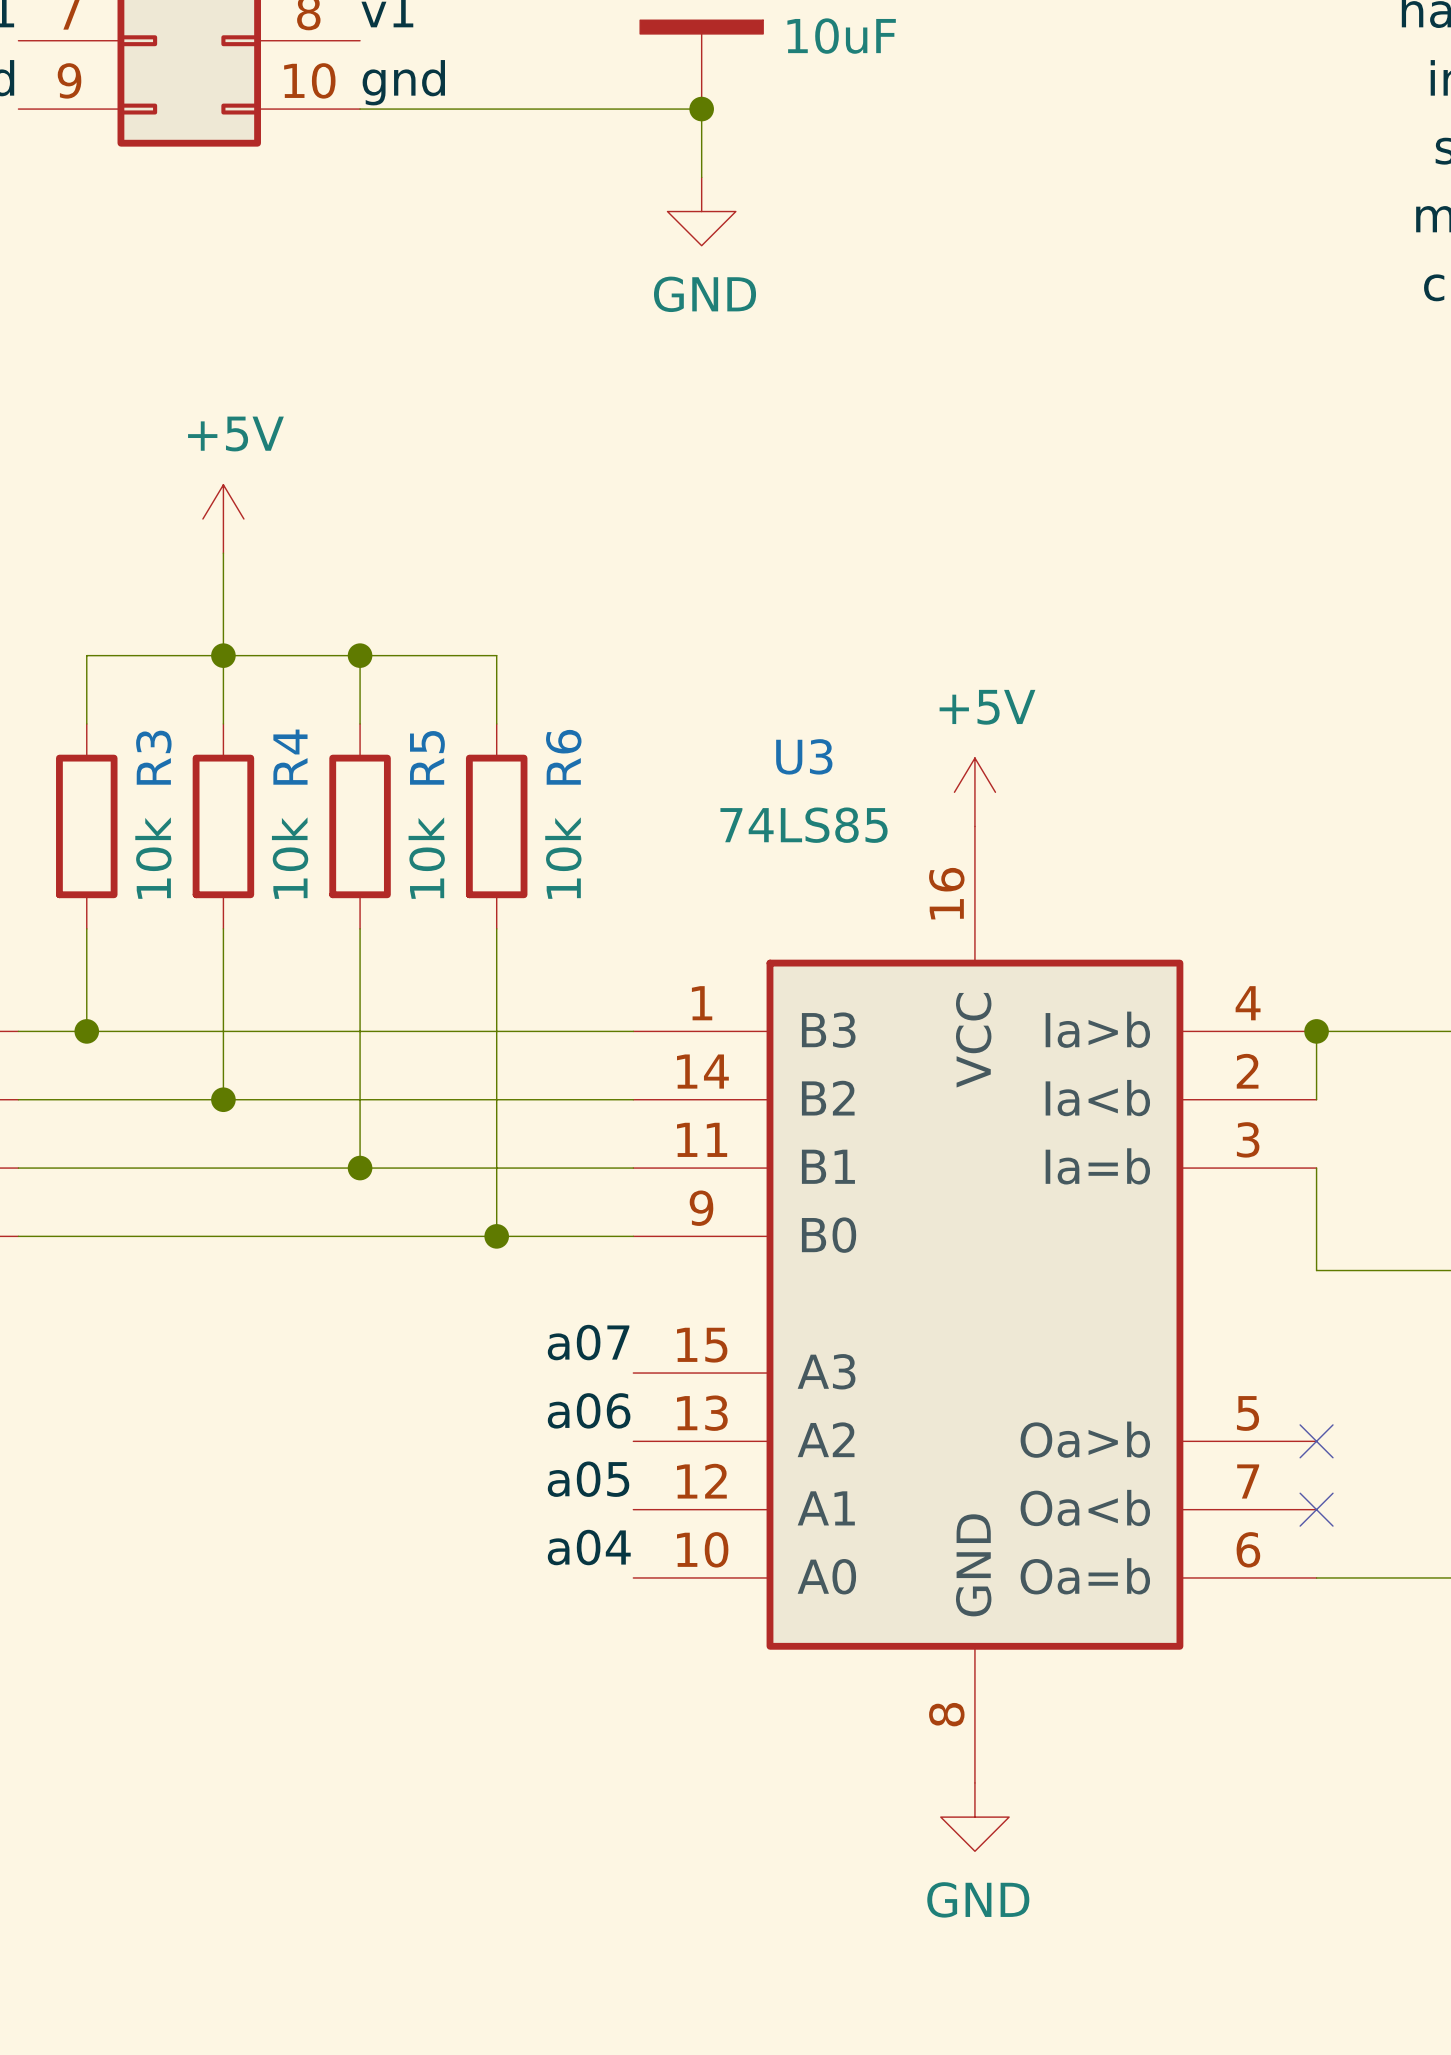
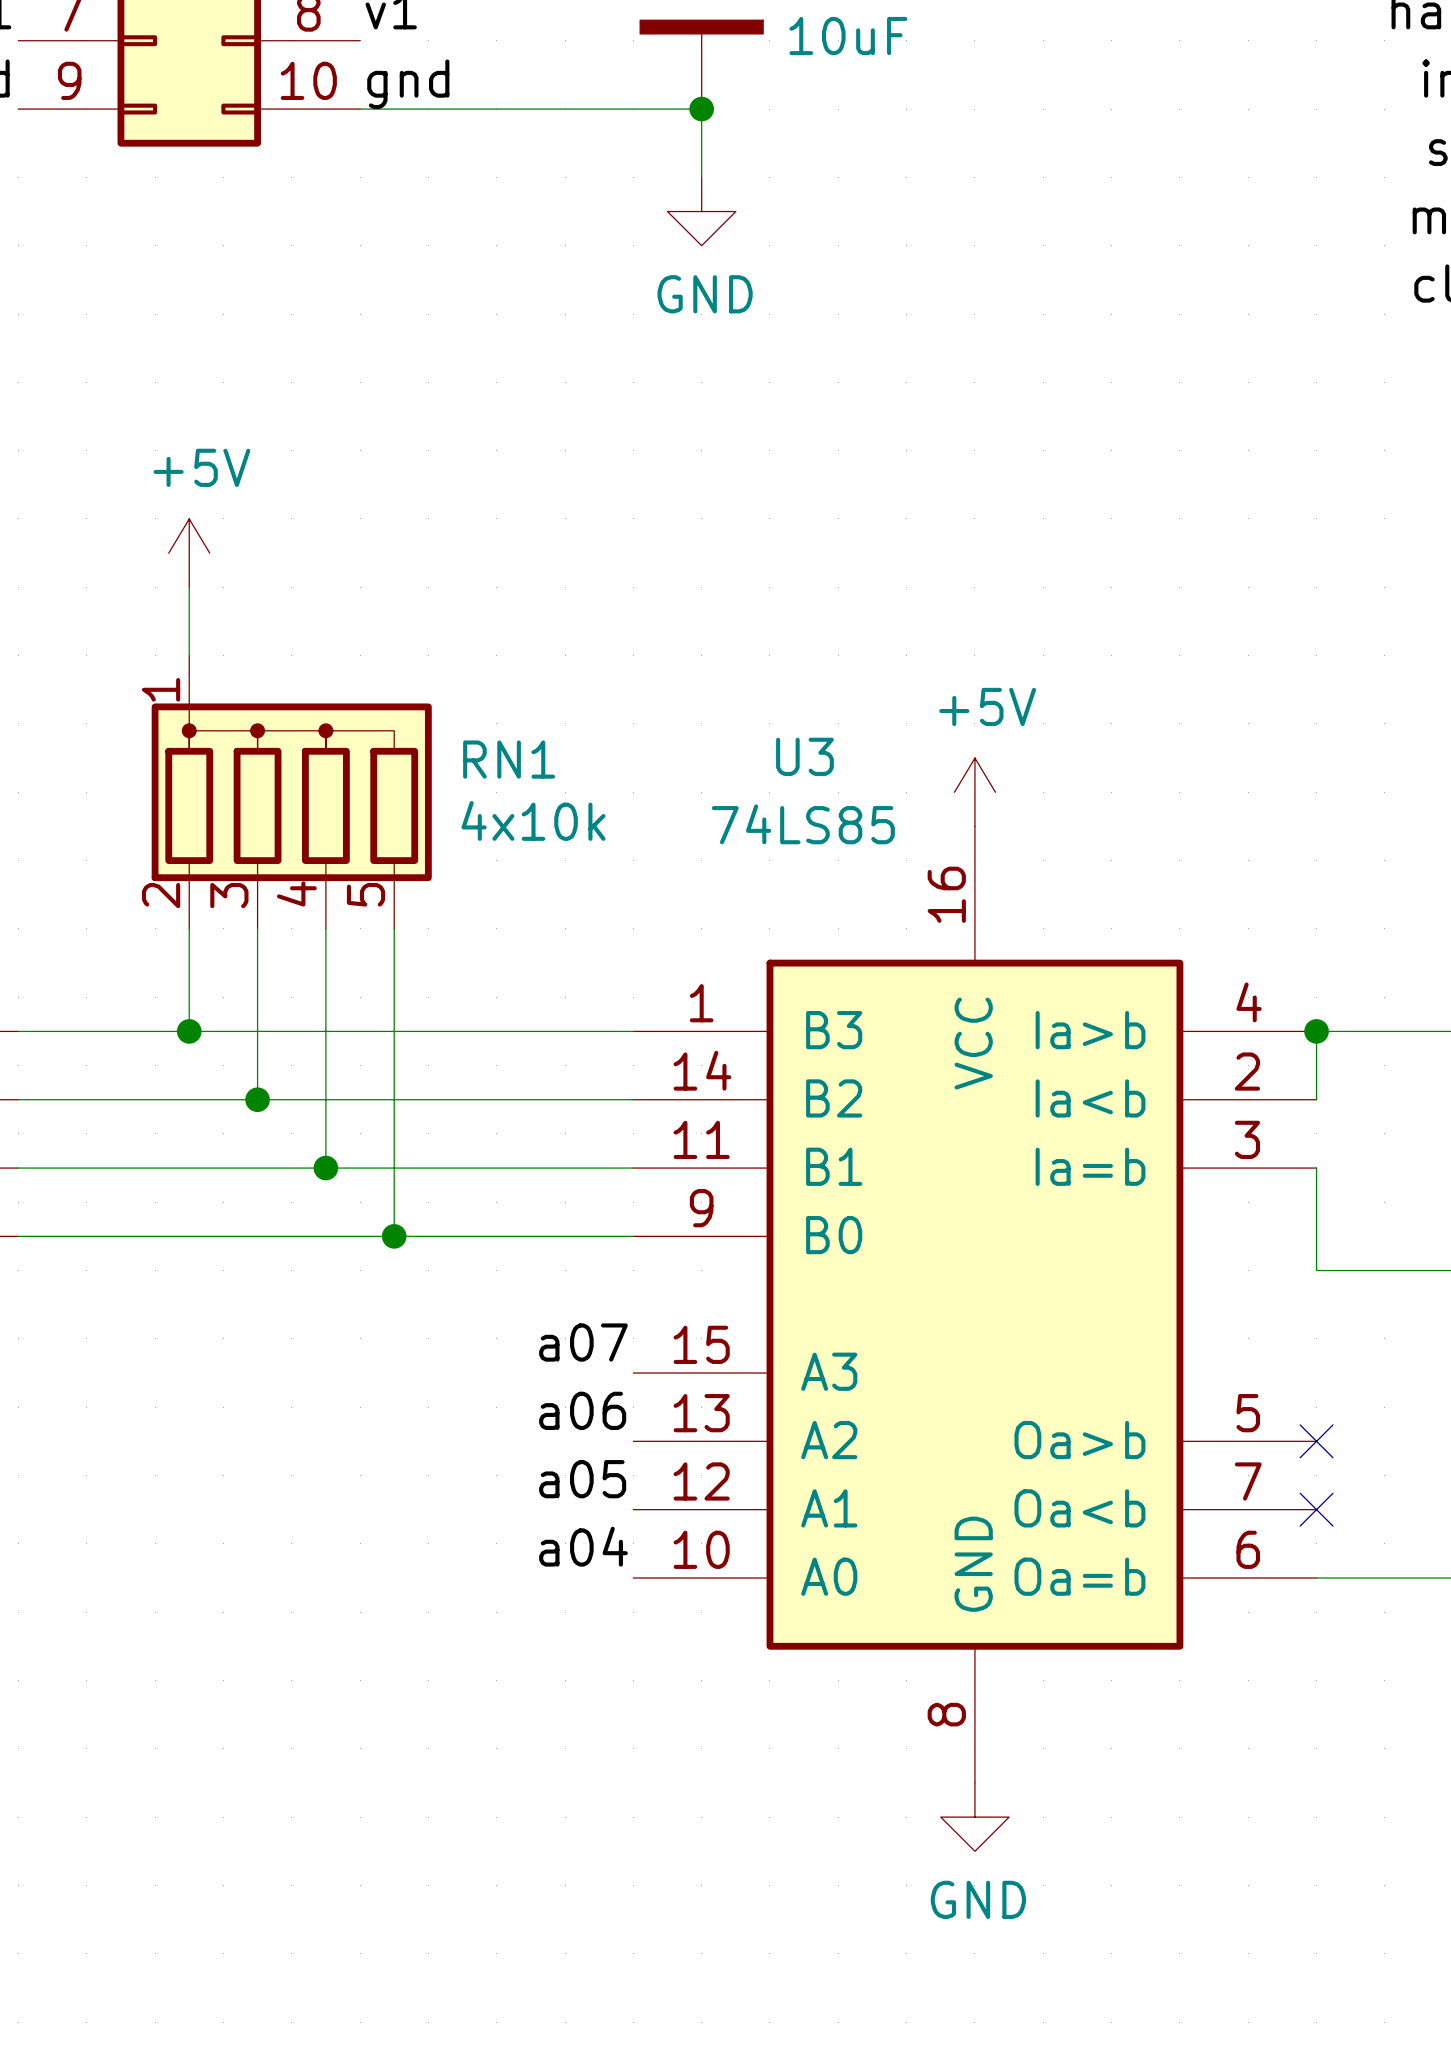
power symbol position: +5V (223, 518) -> +5V (189, 553)
wire: (223, 553) (223, 723) -> none
junction: (223, 655) -> none
wire: (360, 655) (360, 723) -> (189, 587) (189, 655)
junction: (360, 655) -> none
wire: (86, 723) (86, 655) (496, 655) (496, 723) -> none
RN1: none -> 4x10k (291, 792)
R3: 10k (86, 826) -> none
R4: 10k (223, 826) -> none
R5: 10k (360, 826) -> none
R6: 10k (496, 826) -> none
wire: (86, 928) (86, 1031) -> (189, 928) (189, 1031)
wire: (223, 928) (223, 1099) -> (257, 928) (257, 1099)
wire: (360, 928) (360, 1168) -> (325, 928) (325, 1168)
wire: (496, 928) (496, 1236) -> (394, 928) (394, 1236)
junction: (86, 1031) -> none
junction: none -> (189, 1031)
junction position: (223, 1099) -> (257, 1099)
junction position: (360, 1168) -> (325, 1168)
junction: none -> (394, 1236)
junction: (496, 1236) -> none

